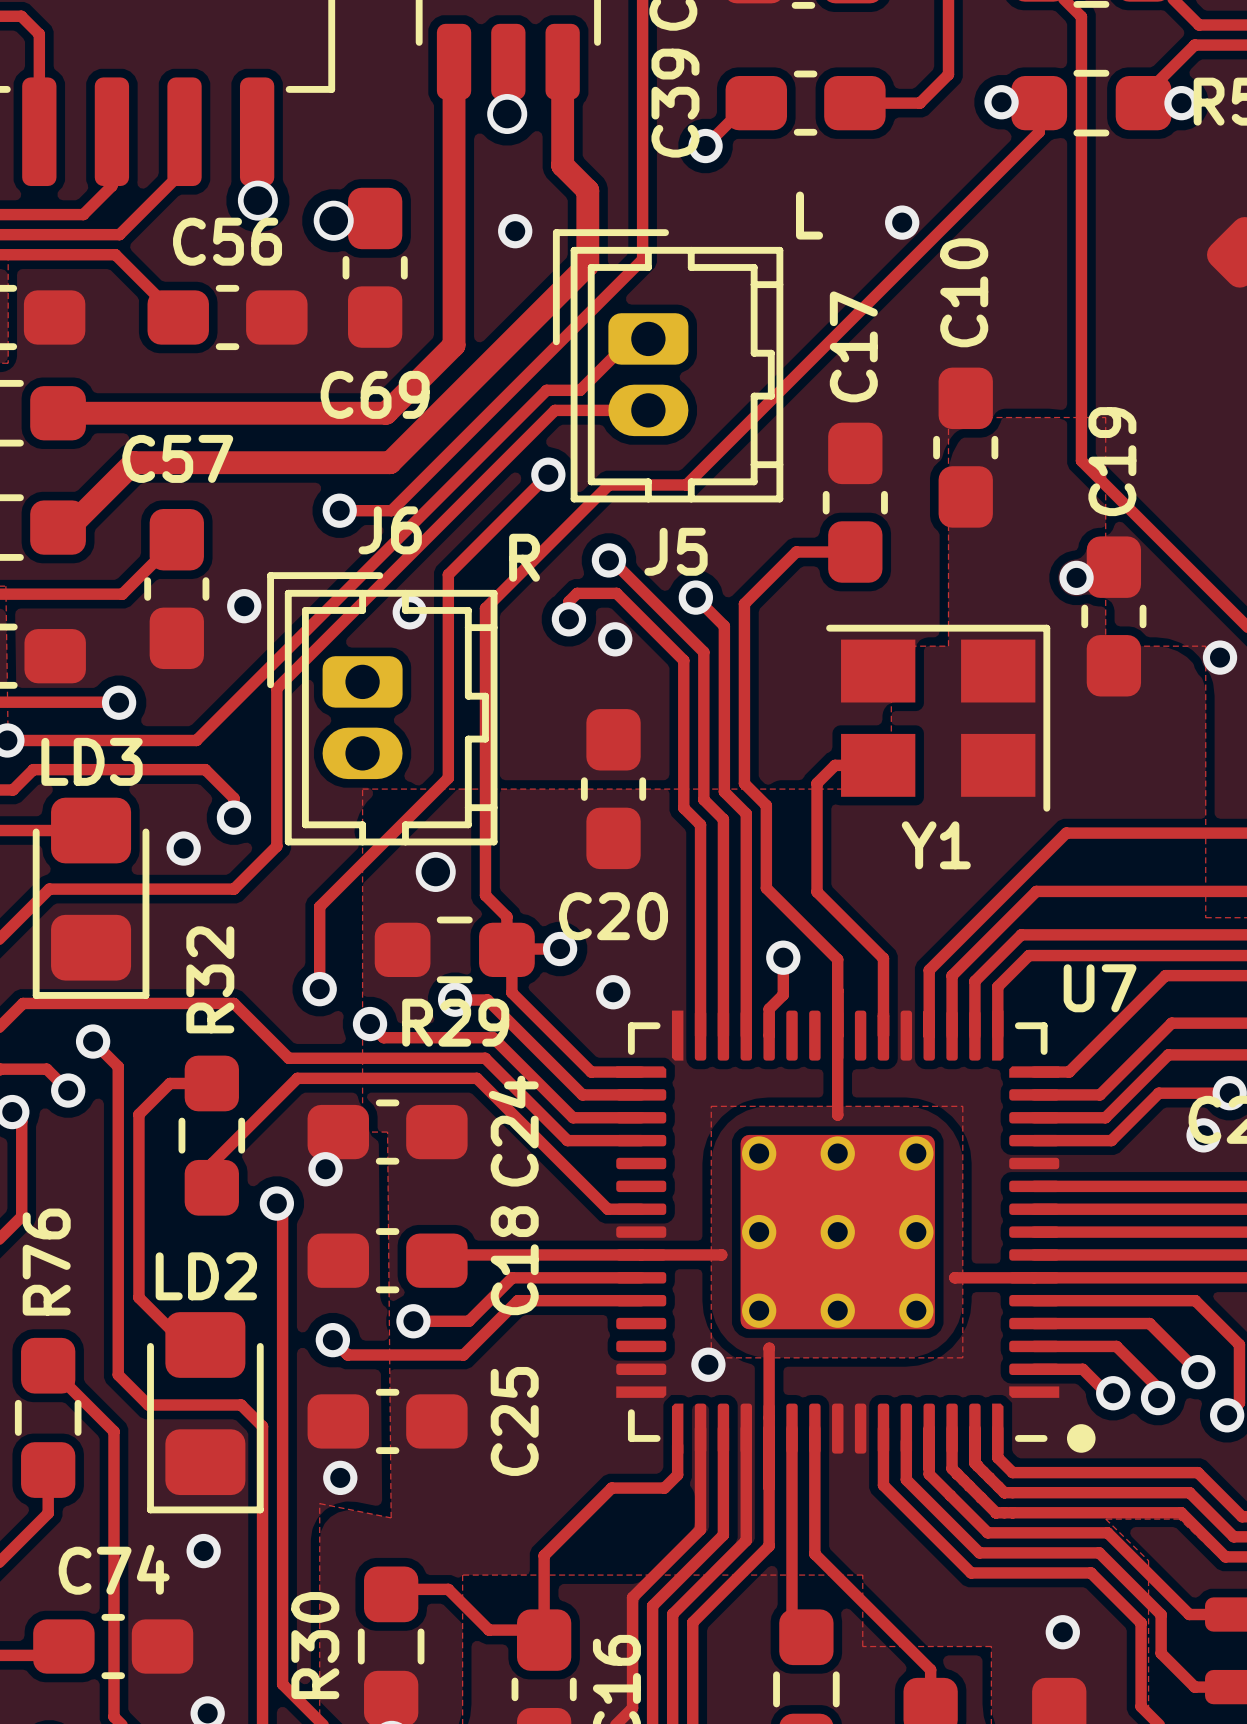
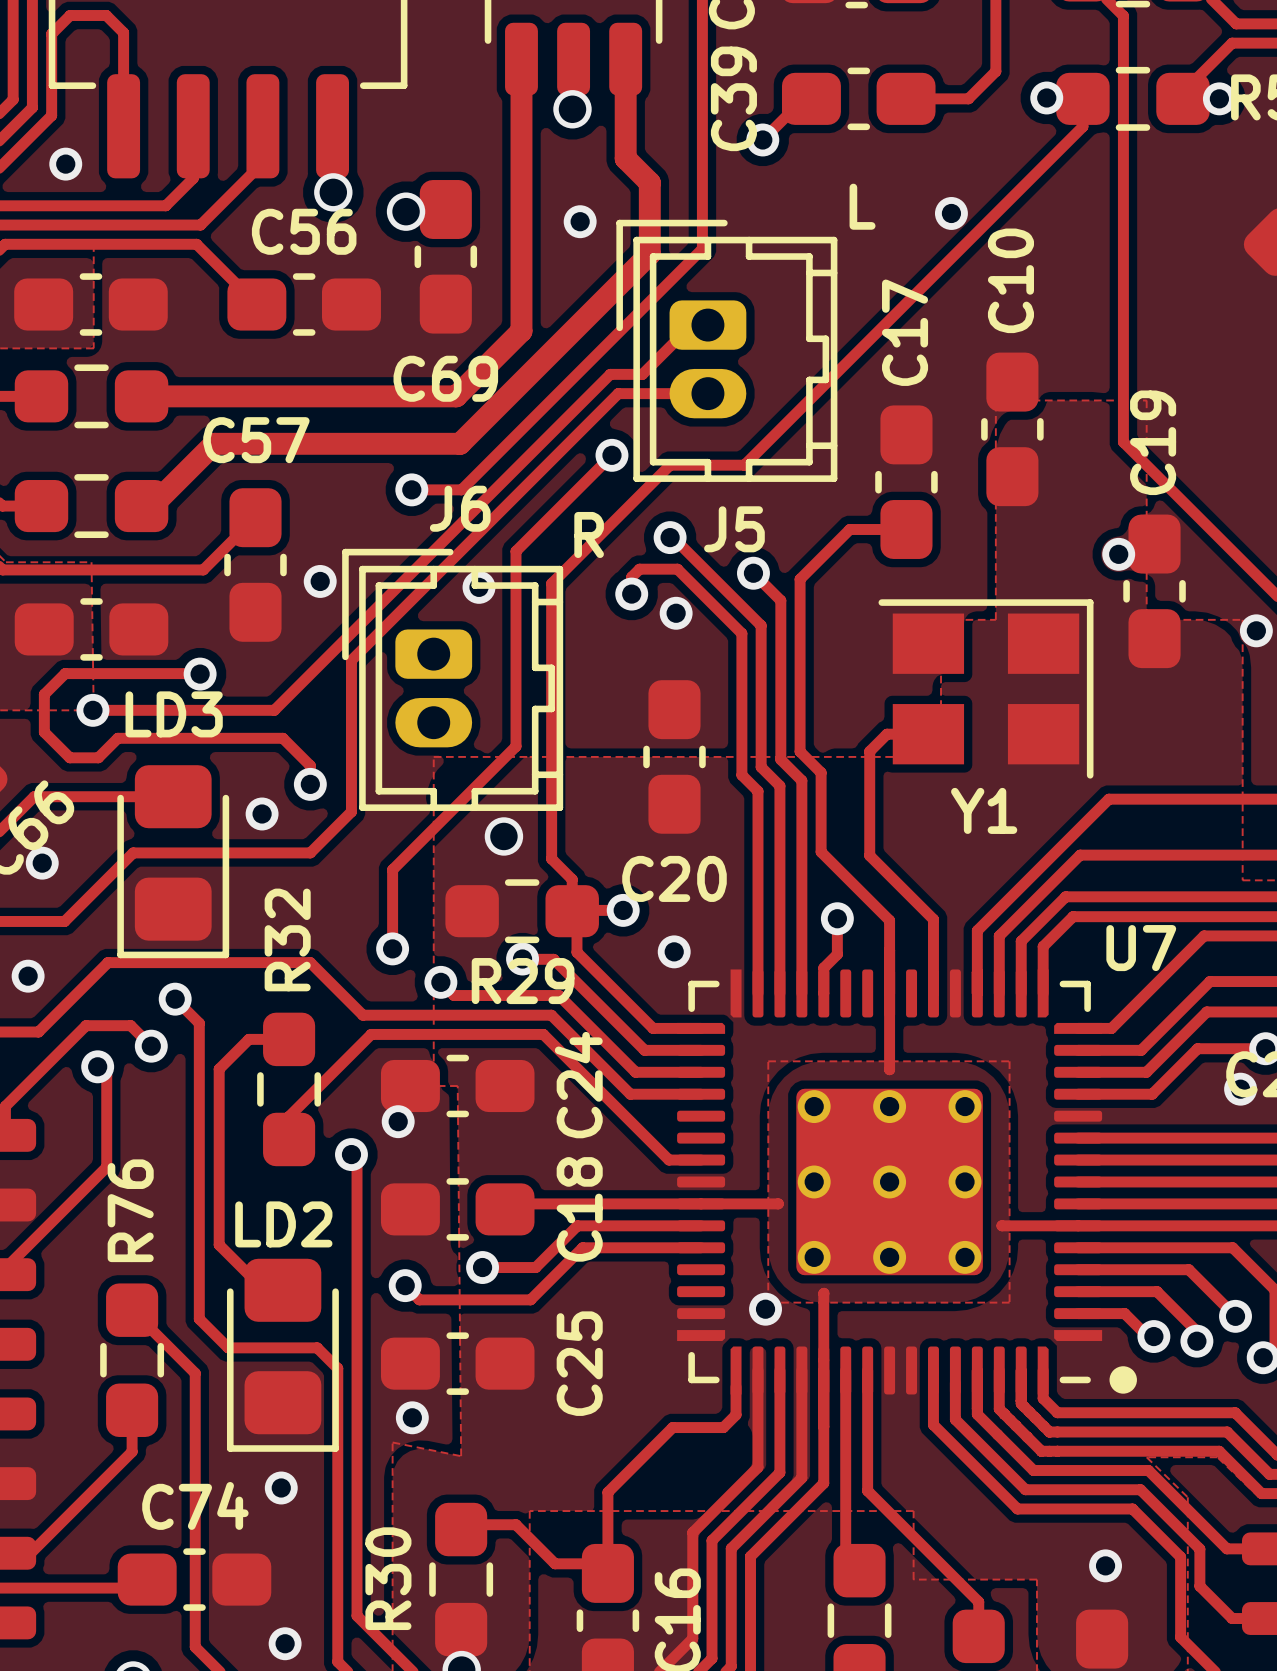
LD3 name position: LD3 (92, 761) -> LD3 (174, 714)

